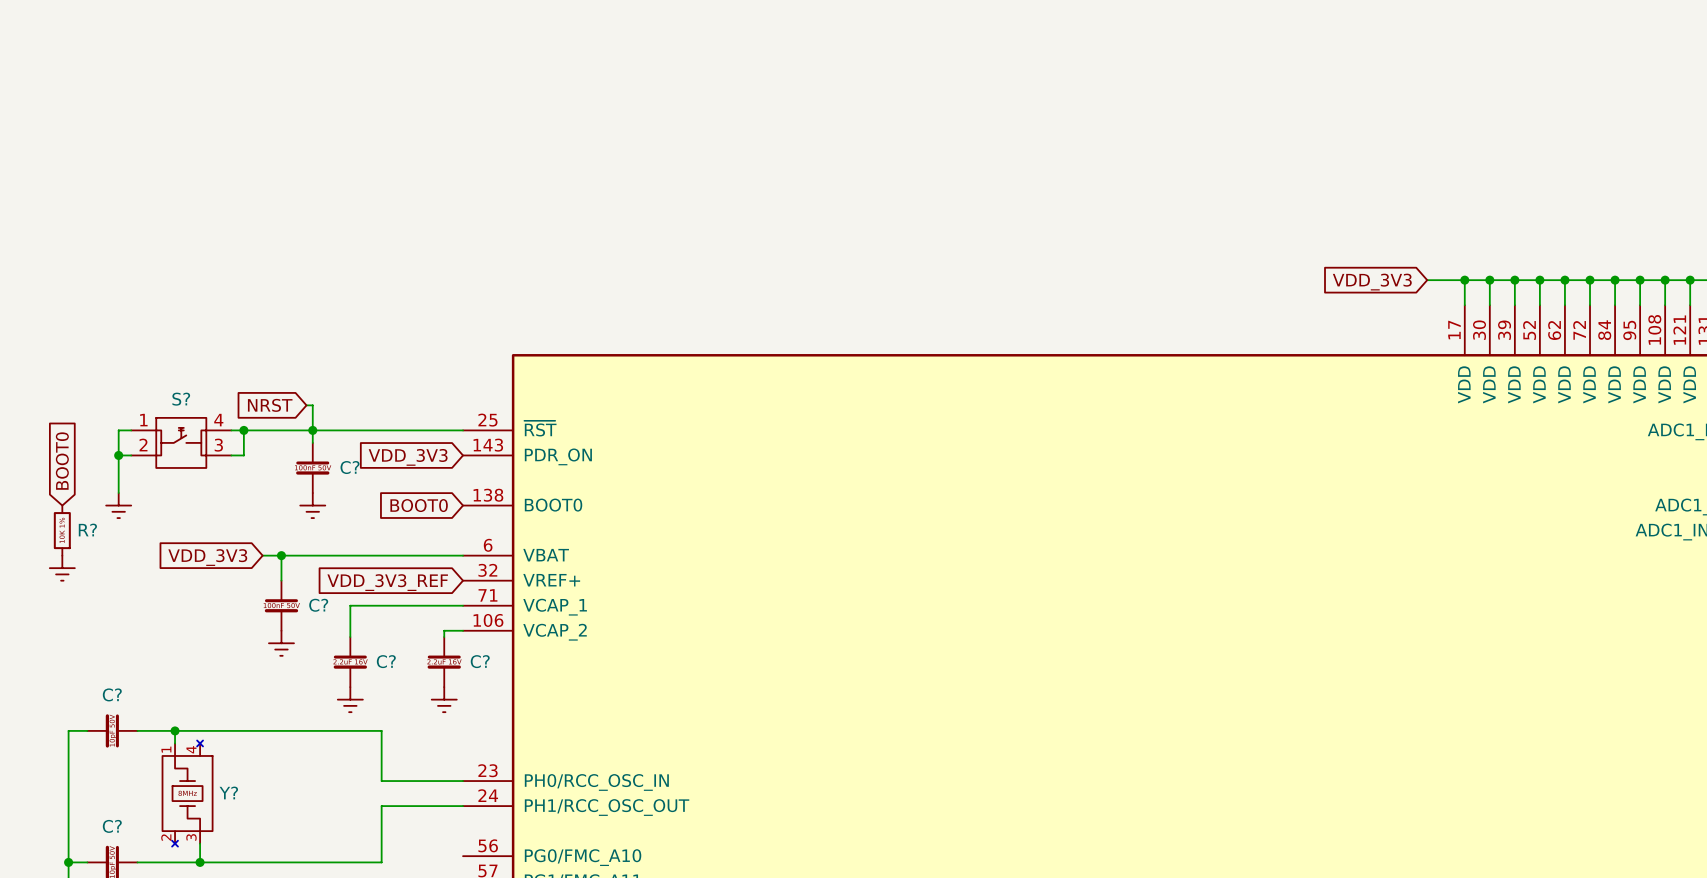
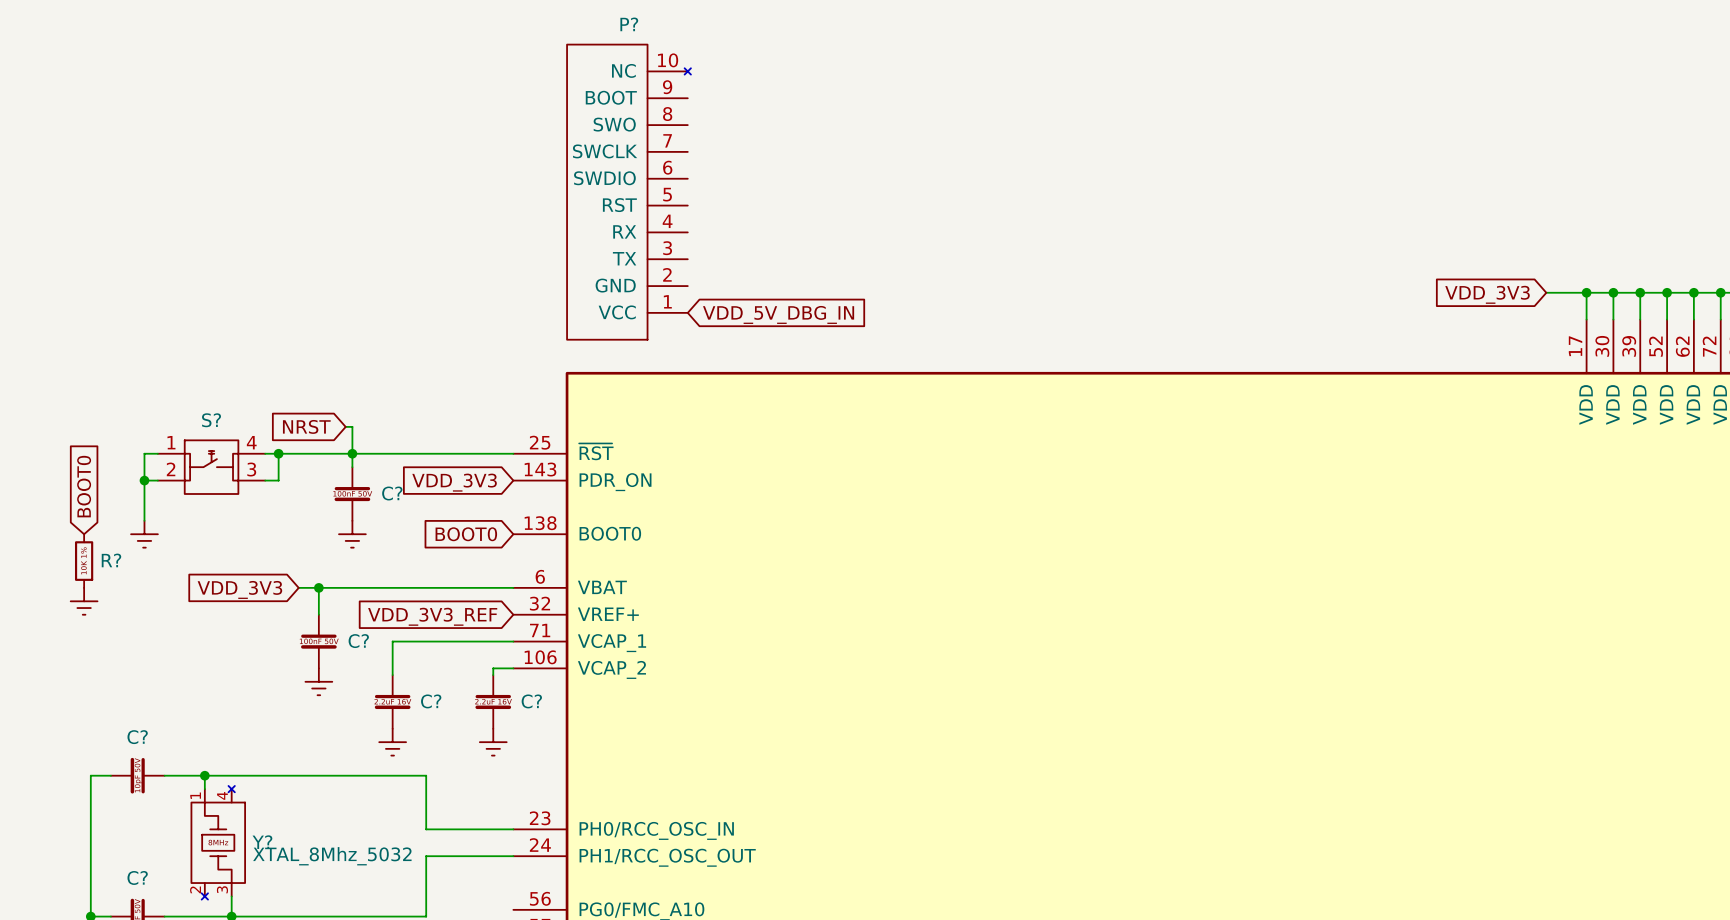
P?: none -> (629, 192)
global label: none -> VDD_5V_DBG_IN (778, 314)
Y? value: none -> XTAL_8Mhz_5032 (332, 856)

